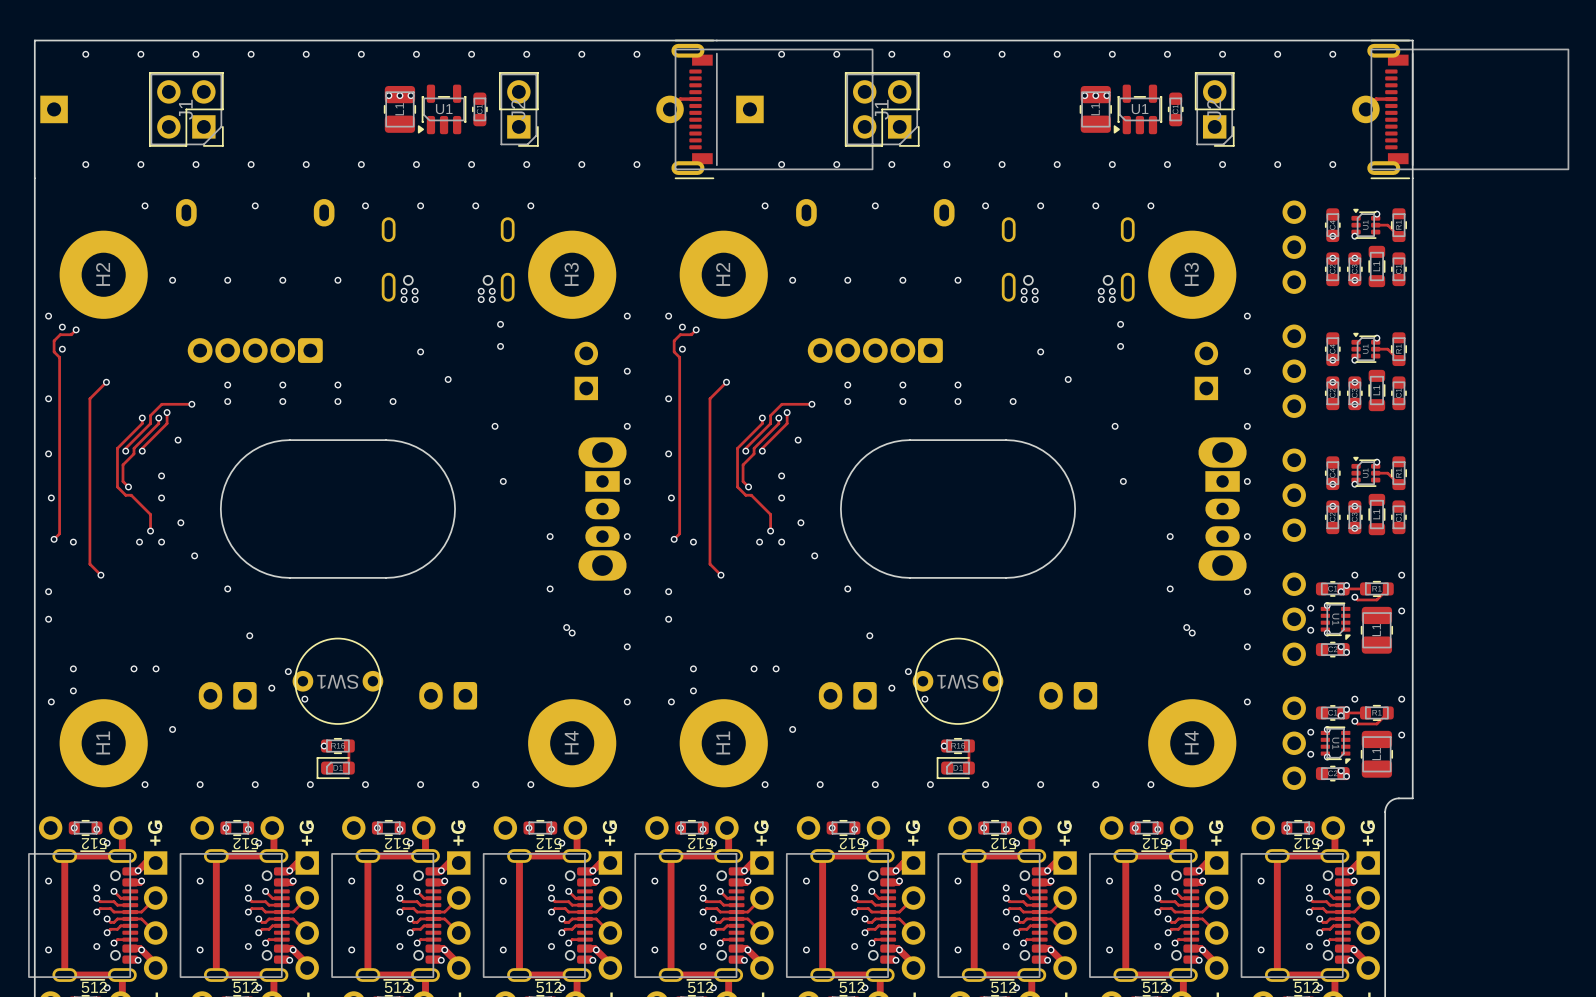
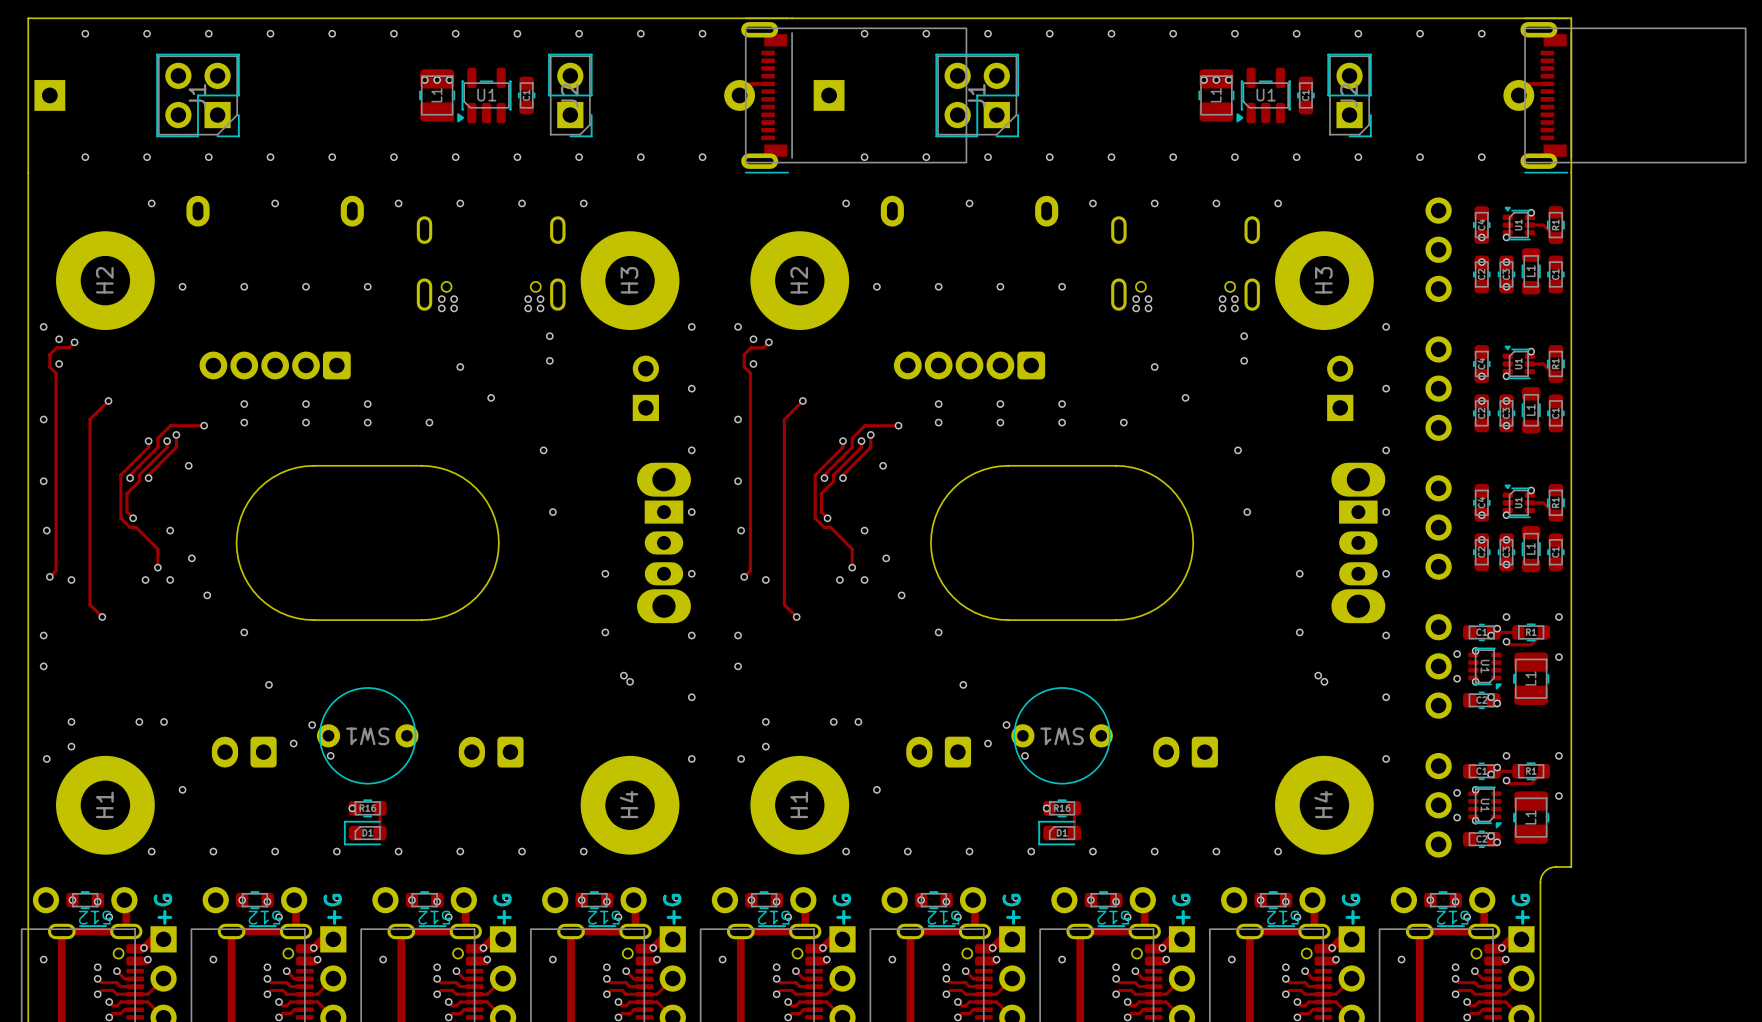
via: (161, 475) -> none
via: (781, 475) -> none

